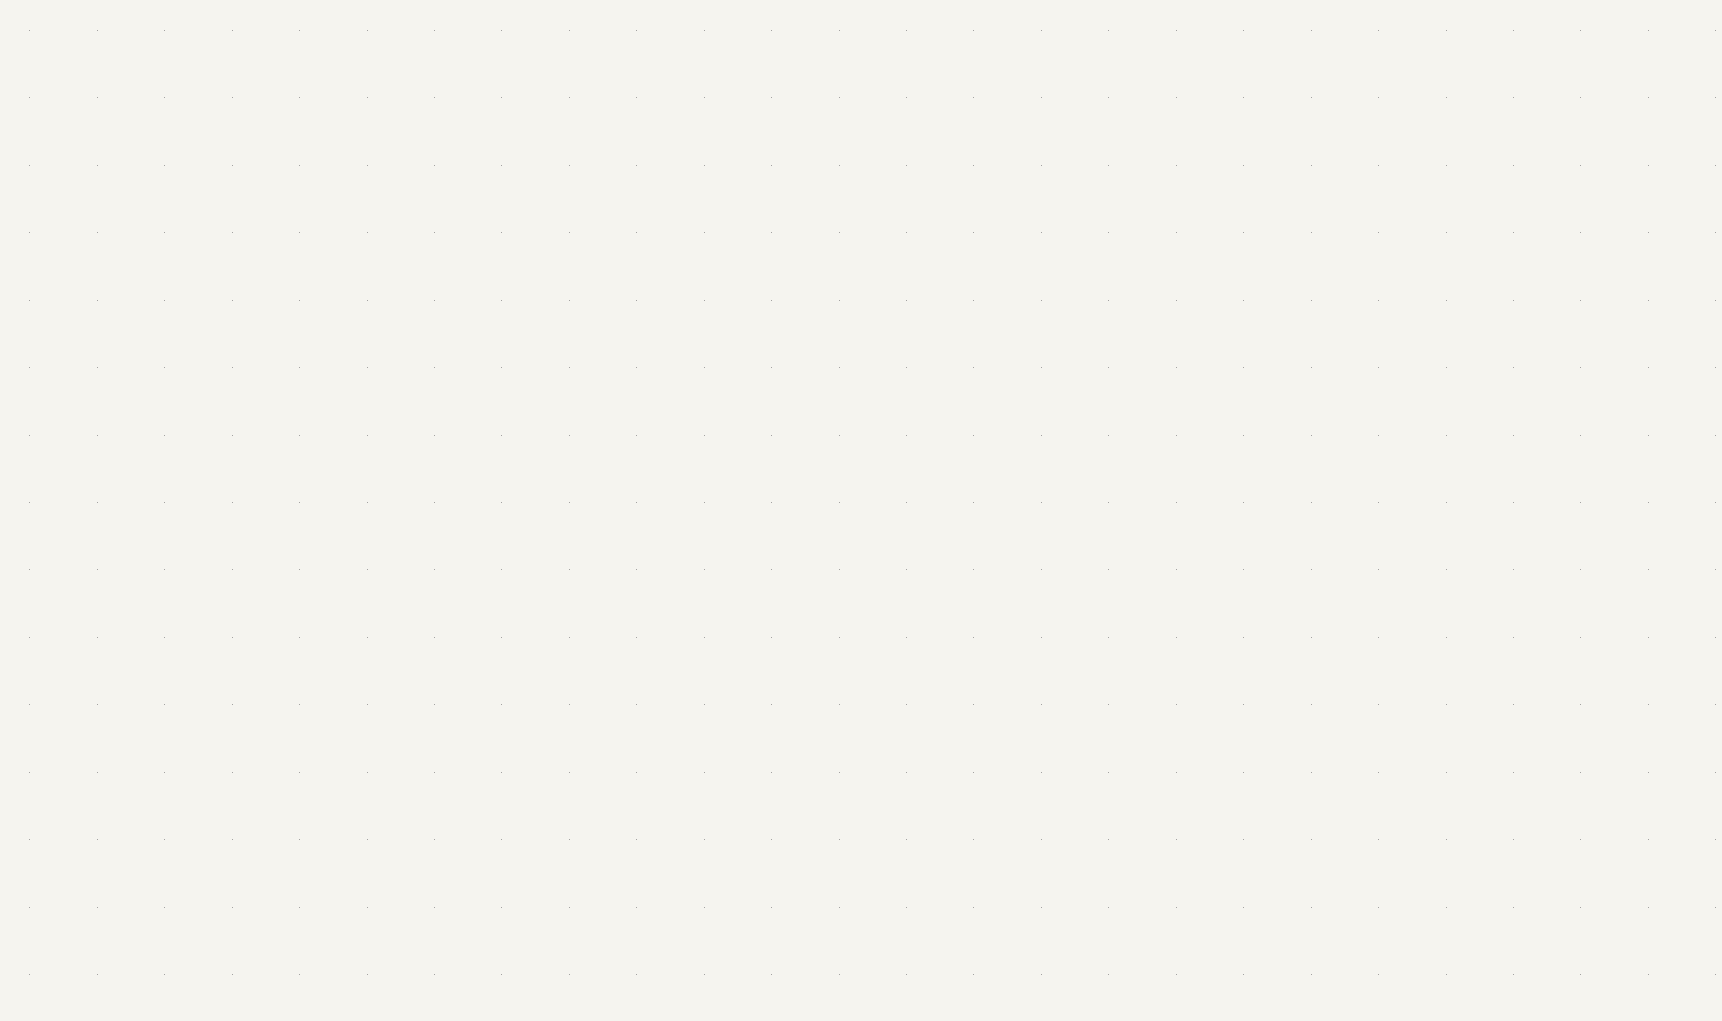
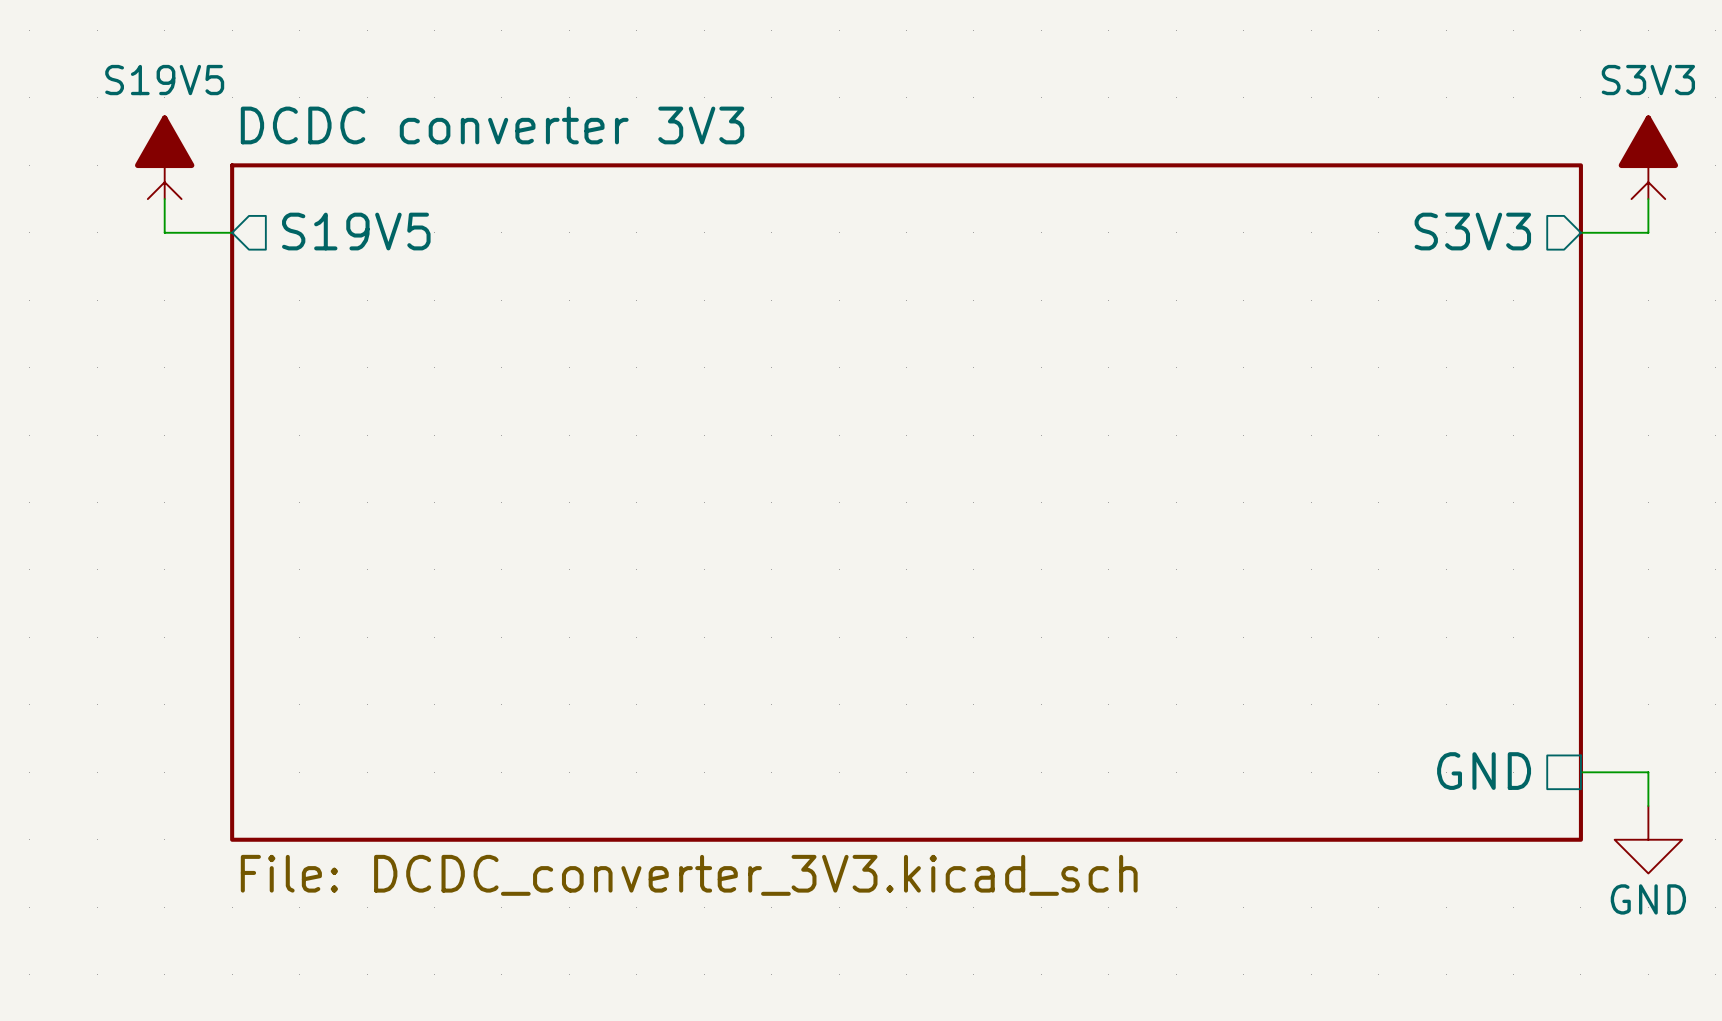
power symbol: none -> S19V5 (164, 157)
power symbol: none -> S3V3 (1648, 157)
wire: none -> (164, 199) (164, 232) (232, 232)
wire: none -> (1648, 199) (1648, 232) (1580, 232)
sheet pin: none -> S19V5 (356, 231)
sheet pin: none -> S3V3 (1472, 231)
sheet DCDC converter 3V3: none -> File: DCDC_converter_3V3.kicad_sch (906, 502)
sheet pin: none -> GND (1484, 771)
wire: none -> (1580, 772) (1648, 772) (1648, 806)
power symbol: none -> GND (1648, 839)

